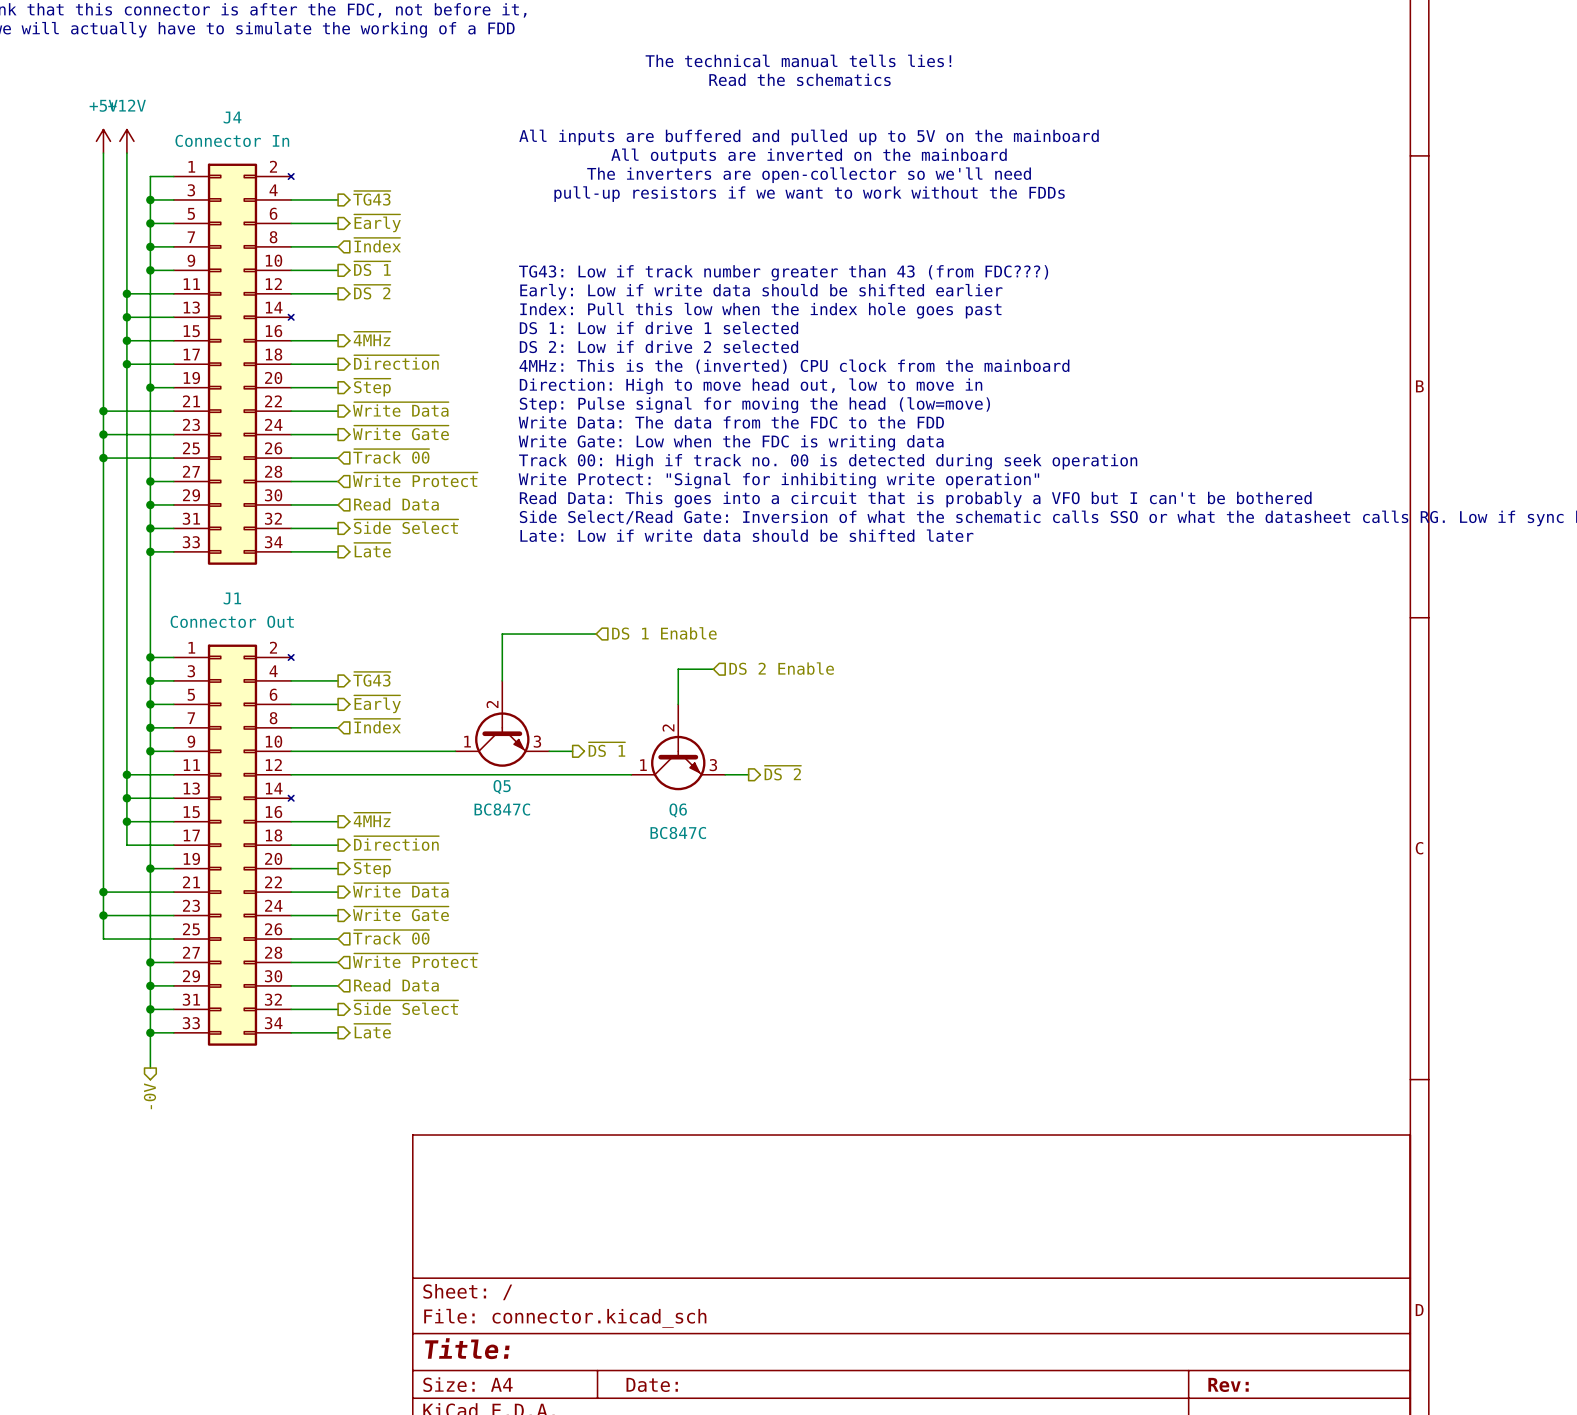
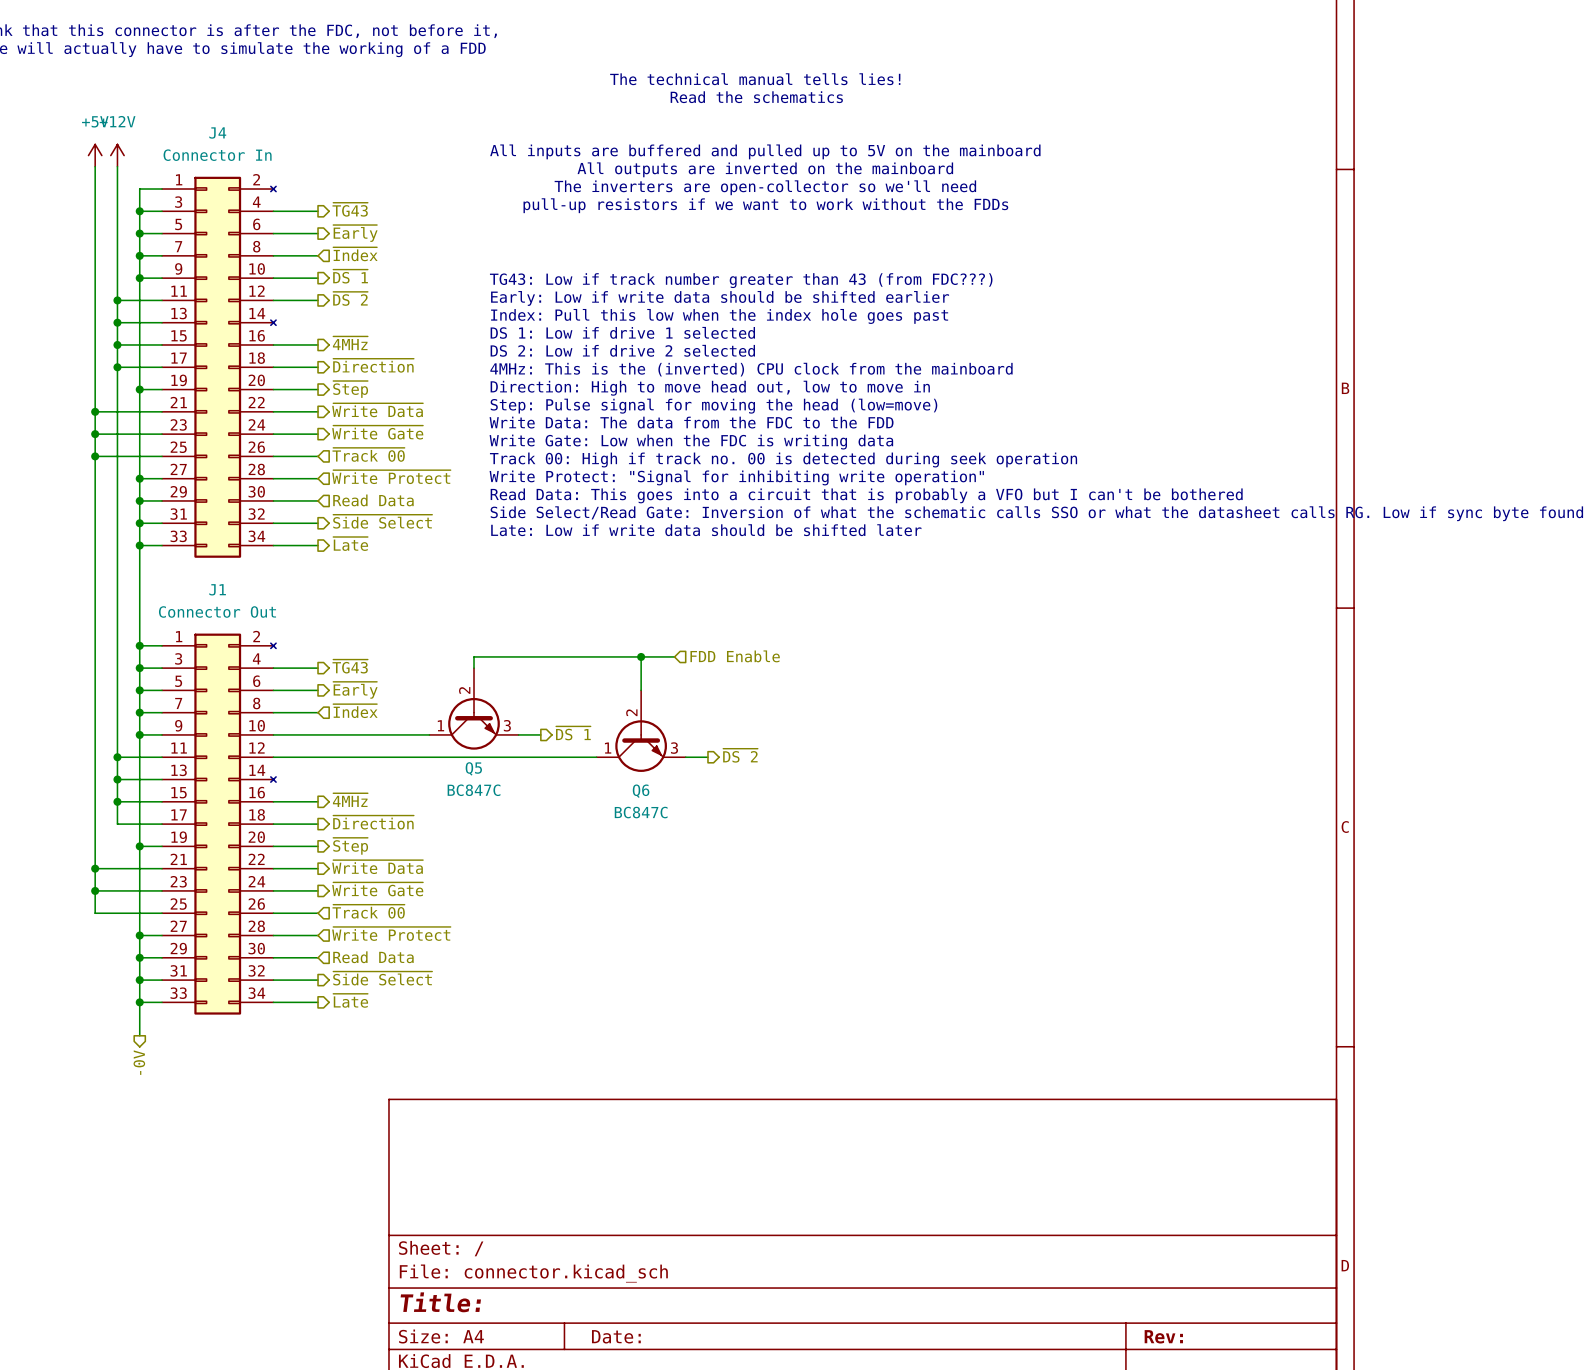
hierarchical label: DS 1 Enable (664, 633) -> none
wire: (596, 634) (502, 634) (502, 669) -> (641, 656) (474, 656)
hierarchical label: DS 2 Enable (781, 668) -> FDD Enable (735, 656)
junction: none -> (641, 656)

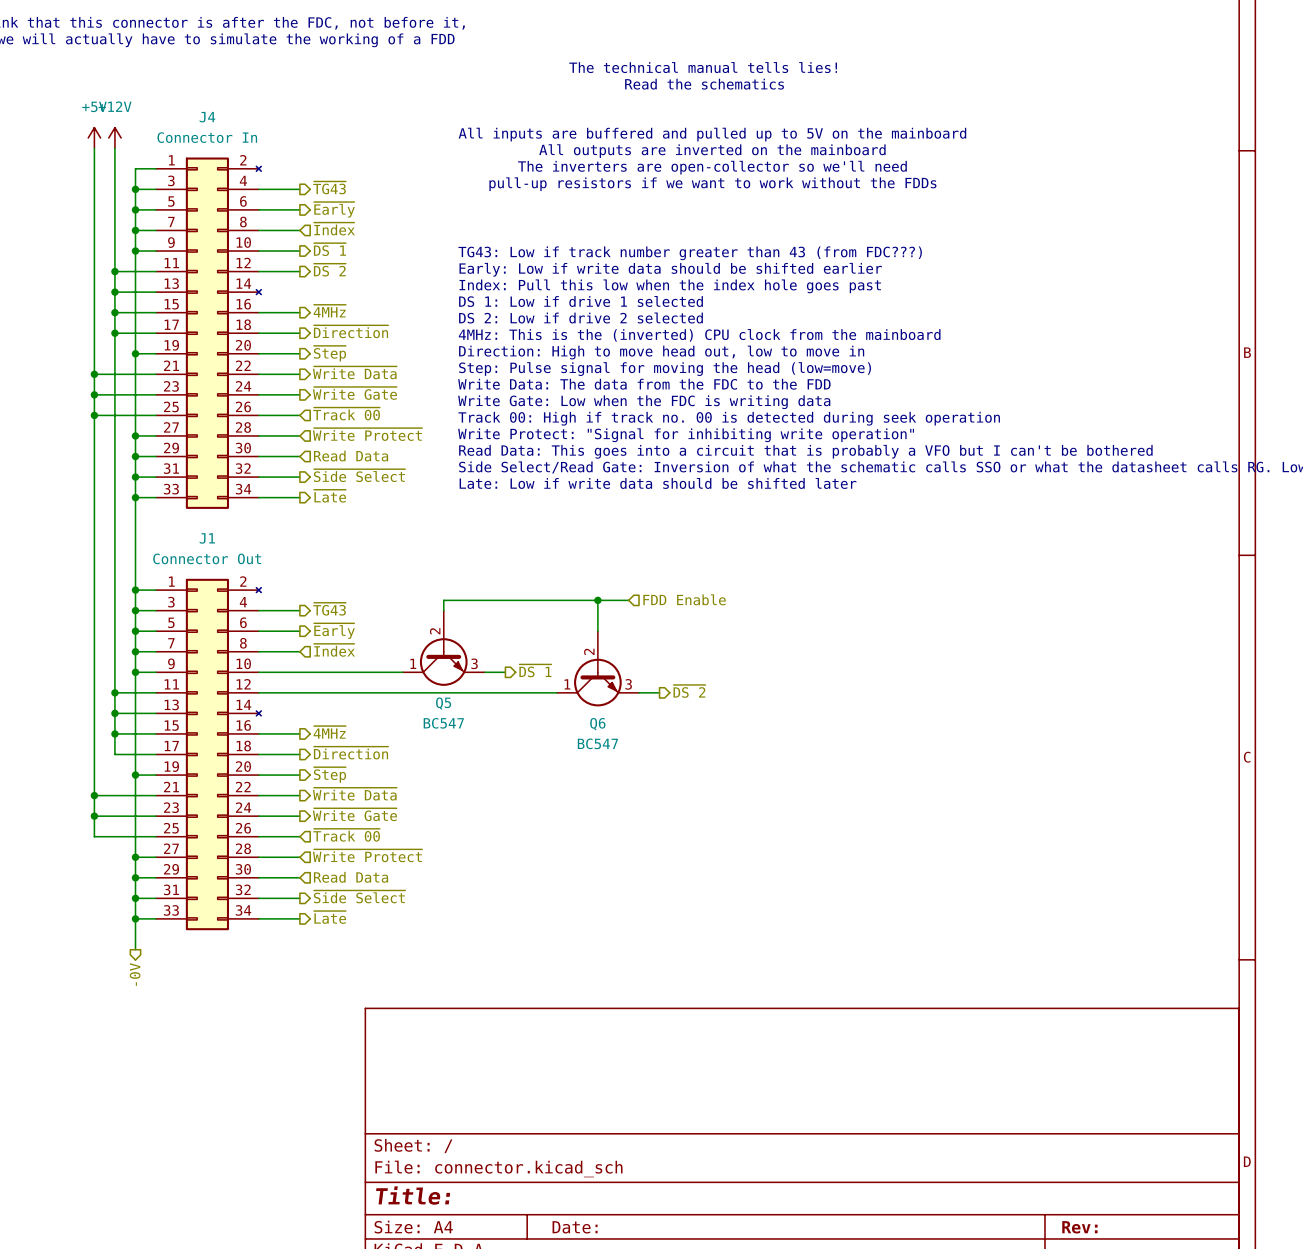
Q5 value: BC847C (474, 790) -> BC547 (443, 723)
Q6 value: BC847C (641, 812) -> BC547 (597, 743)

